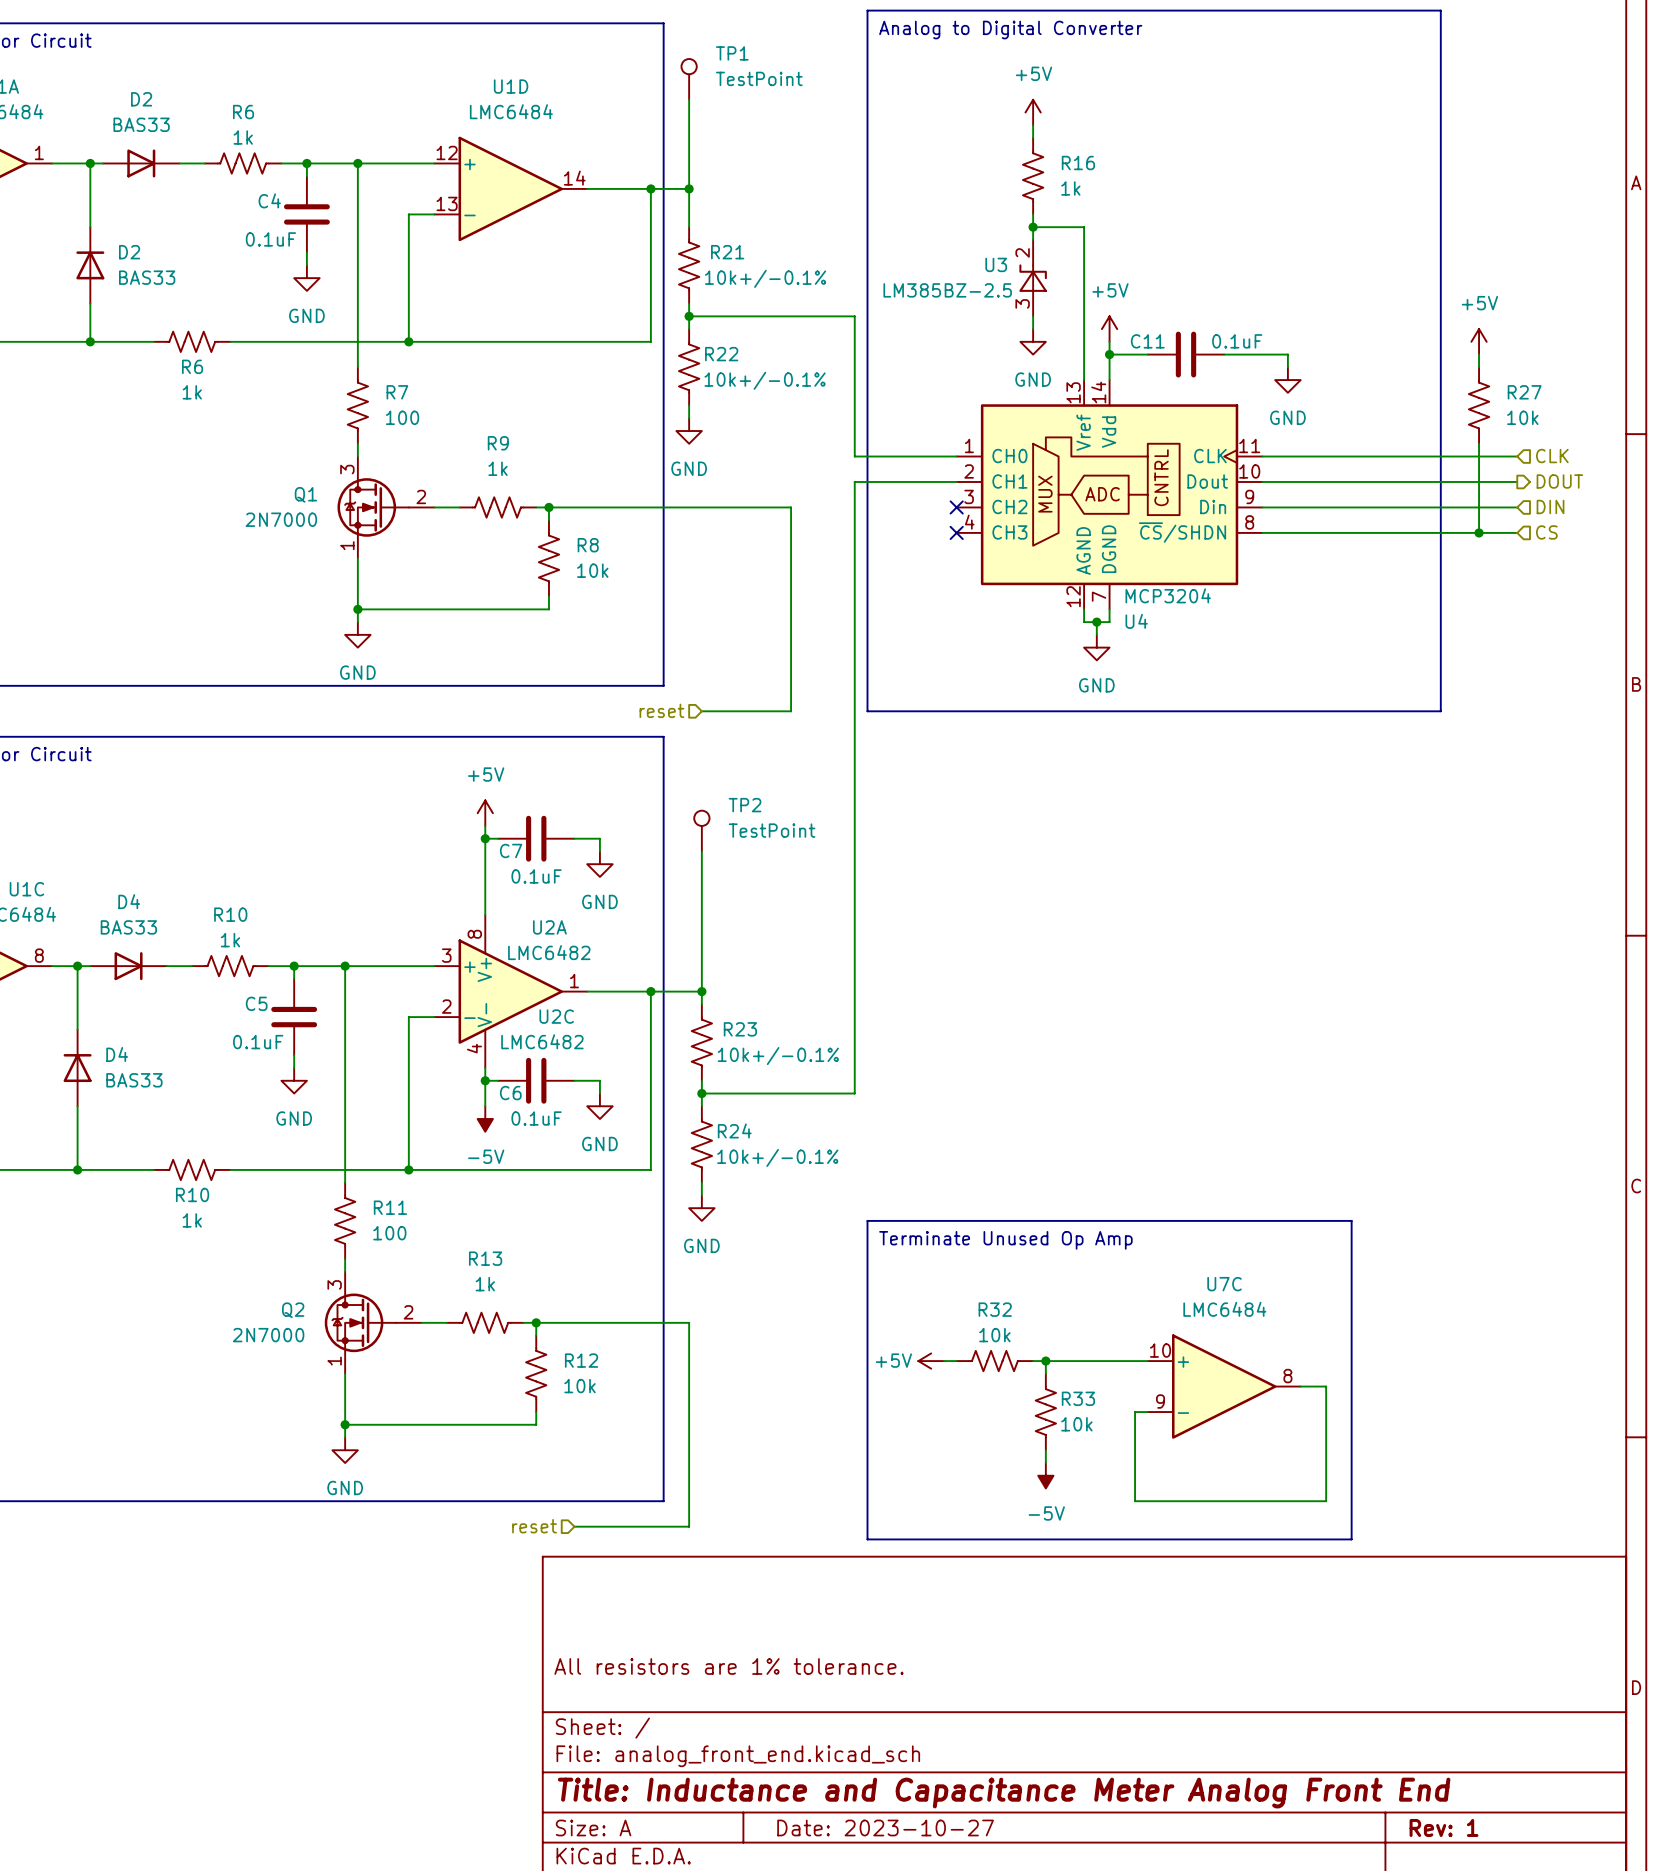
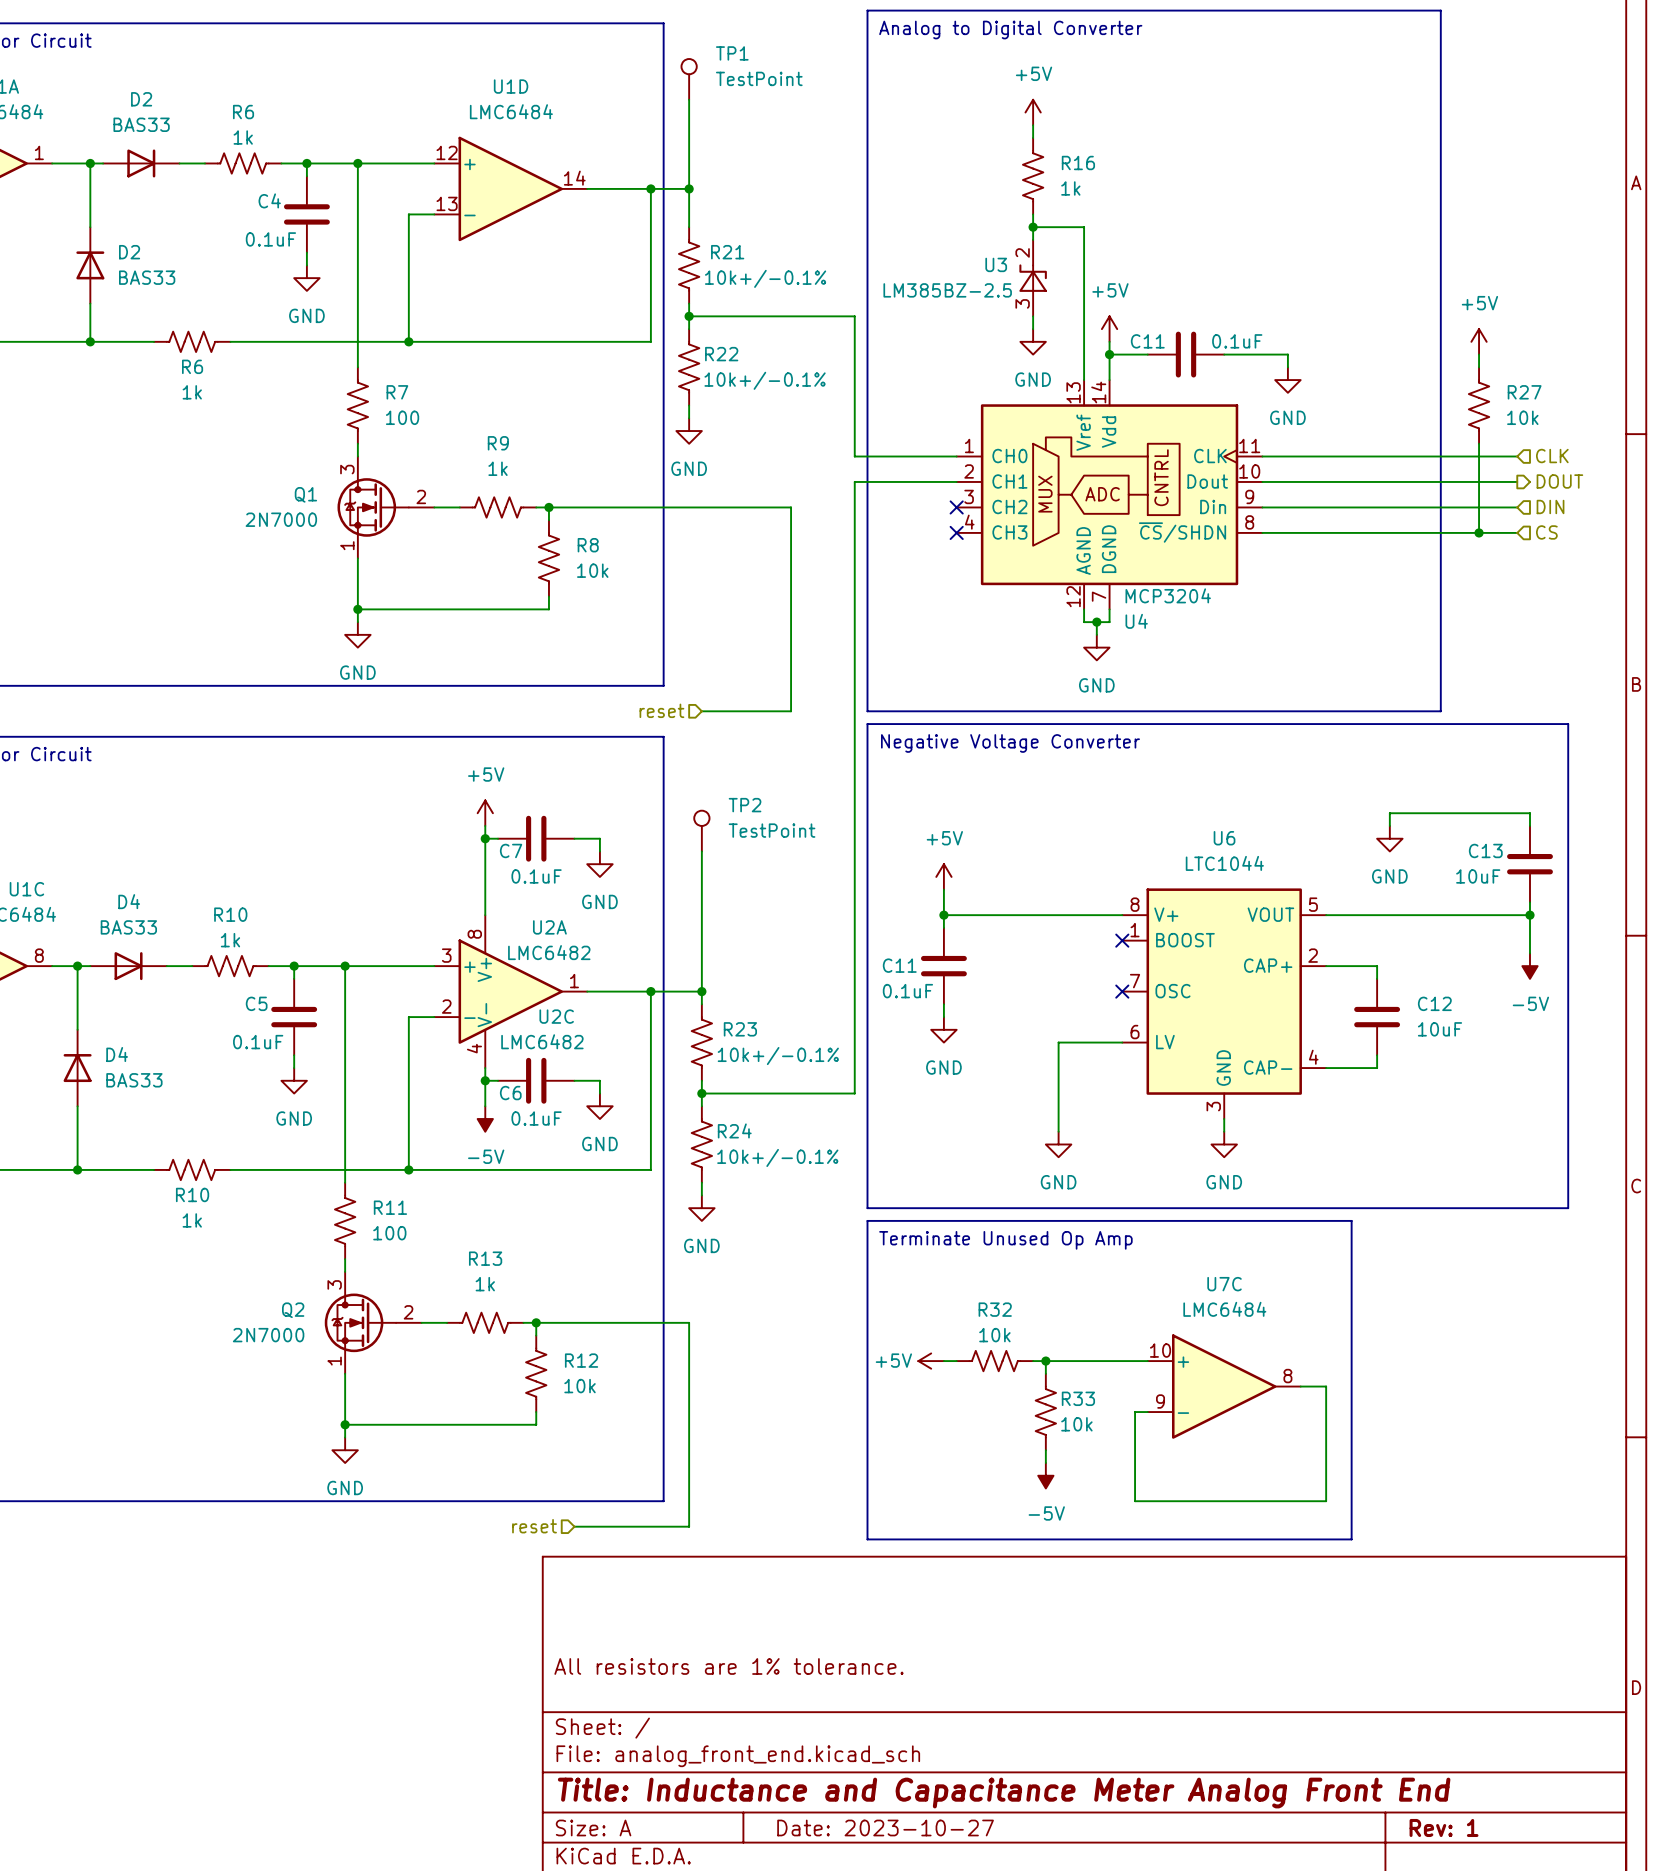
line: none -> (867, 724) (1568, 724) (1568, 1208) (867, 1208) (867, 724)
text: none -> Negative Voltage Converter (1010, 743)
wire: none -> (1389, 825) (1389, 813) (1529, 813) (1529, 825)
power symbol: none -> GND (1389, 838)
C13: none -> 10uF (1529, 864)
power symbol: none -> +5V (943, 876)
wire: none -> (943, 889) (943, 927)
wire: none -> (1529, 902) (1529, 953)
wire: none -> (943, 915) (1122, 915)
junction: none -> (943, 915)
wire: none -> (1326, 915) (1529, 915)
junction: none -> (1529, 915)
no-connect mark: none -> (1122, 940)
C11: none -> 0.1uF (943, 966)
wire: none -> (1326, 966) (1377, 966) (1377, 978)
power symbol: none -> -5V (1529, 966)
no-connect mark: none -> (1122, 991)
U6: none -> LTC1044 (1224, 1003)
wire: none -> (943, 1004) (943, 1017)
C12: none -> 10uF (1377, 1017)
power symbol: none -> GND (943, 1029)
wire: none -> (1122, 1042) (1058, 1042) (1058, 1131)
wire: none -> (1377, 1055) (1377, 1068) (1326, 1068)
wire: none -> (1224, 1119) (1224, 1131)
power symbol: none -> GND (1058, 1144)
power symbol: none -> GND (1224, 1144)

